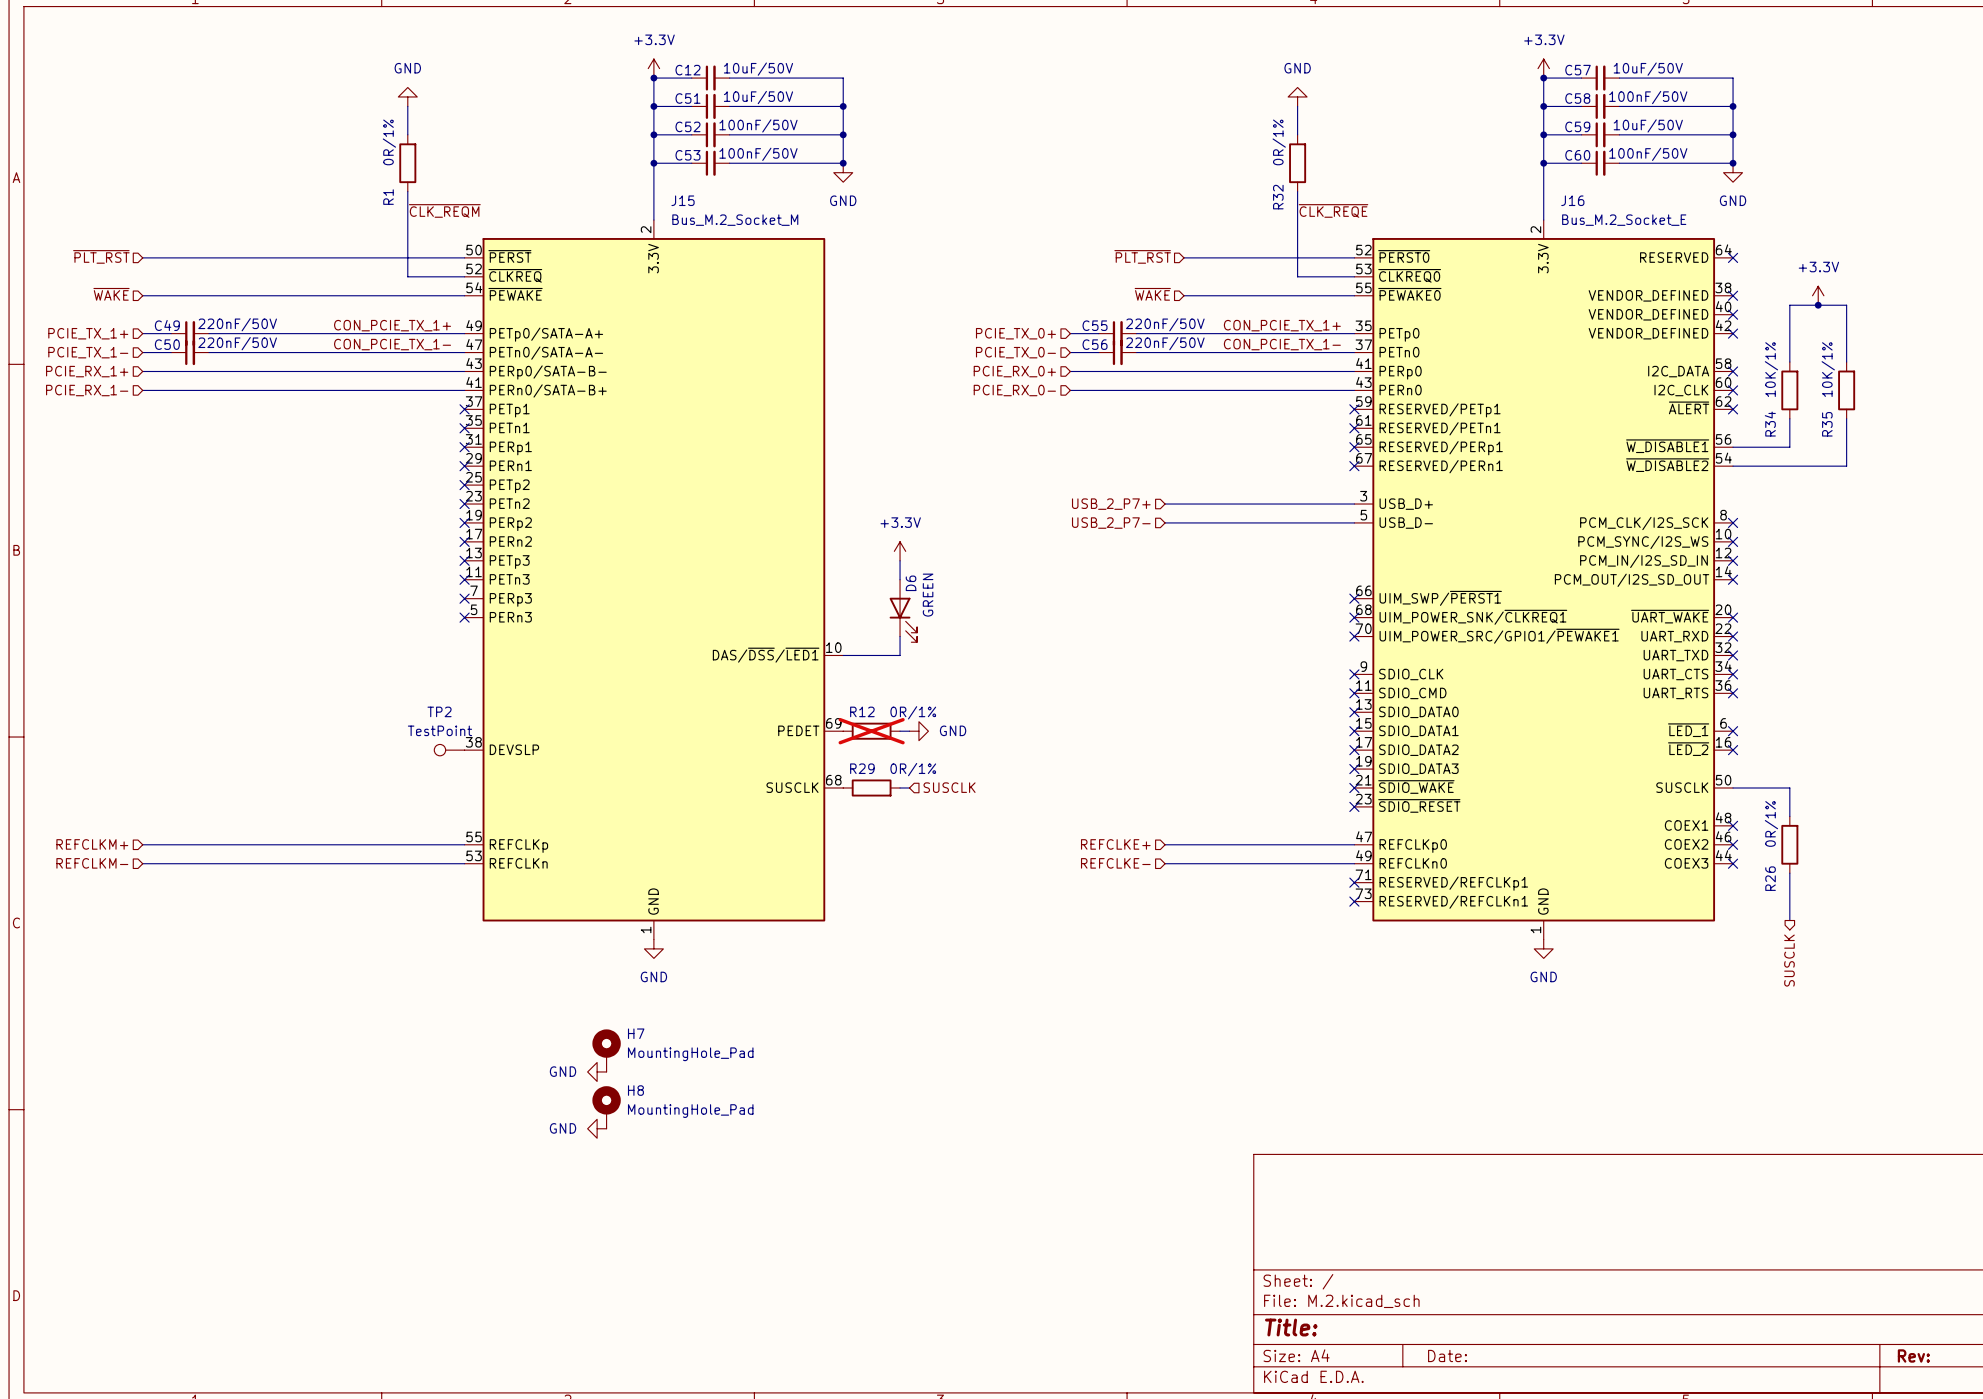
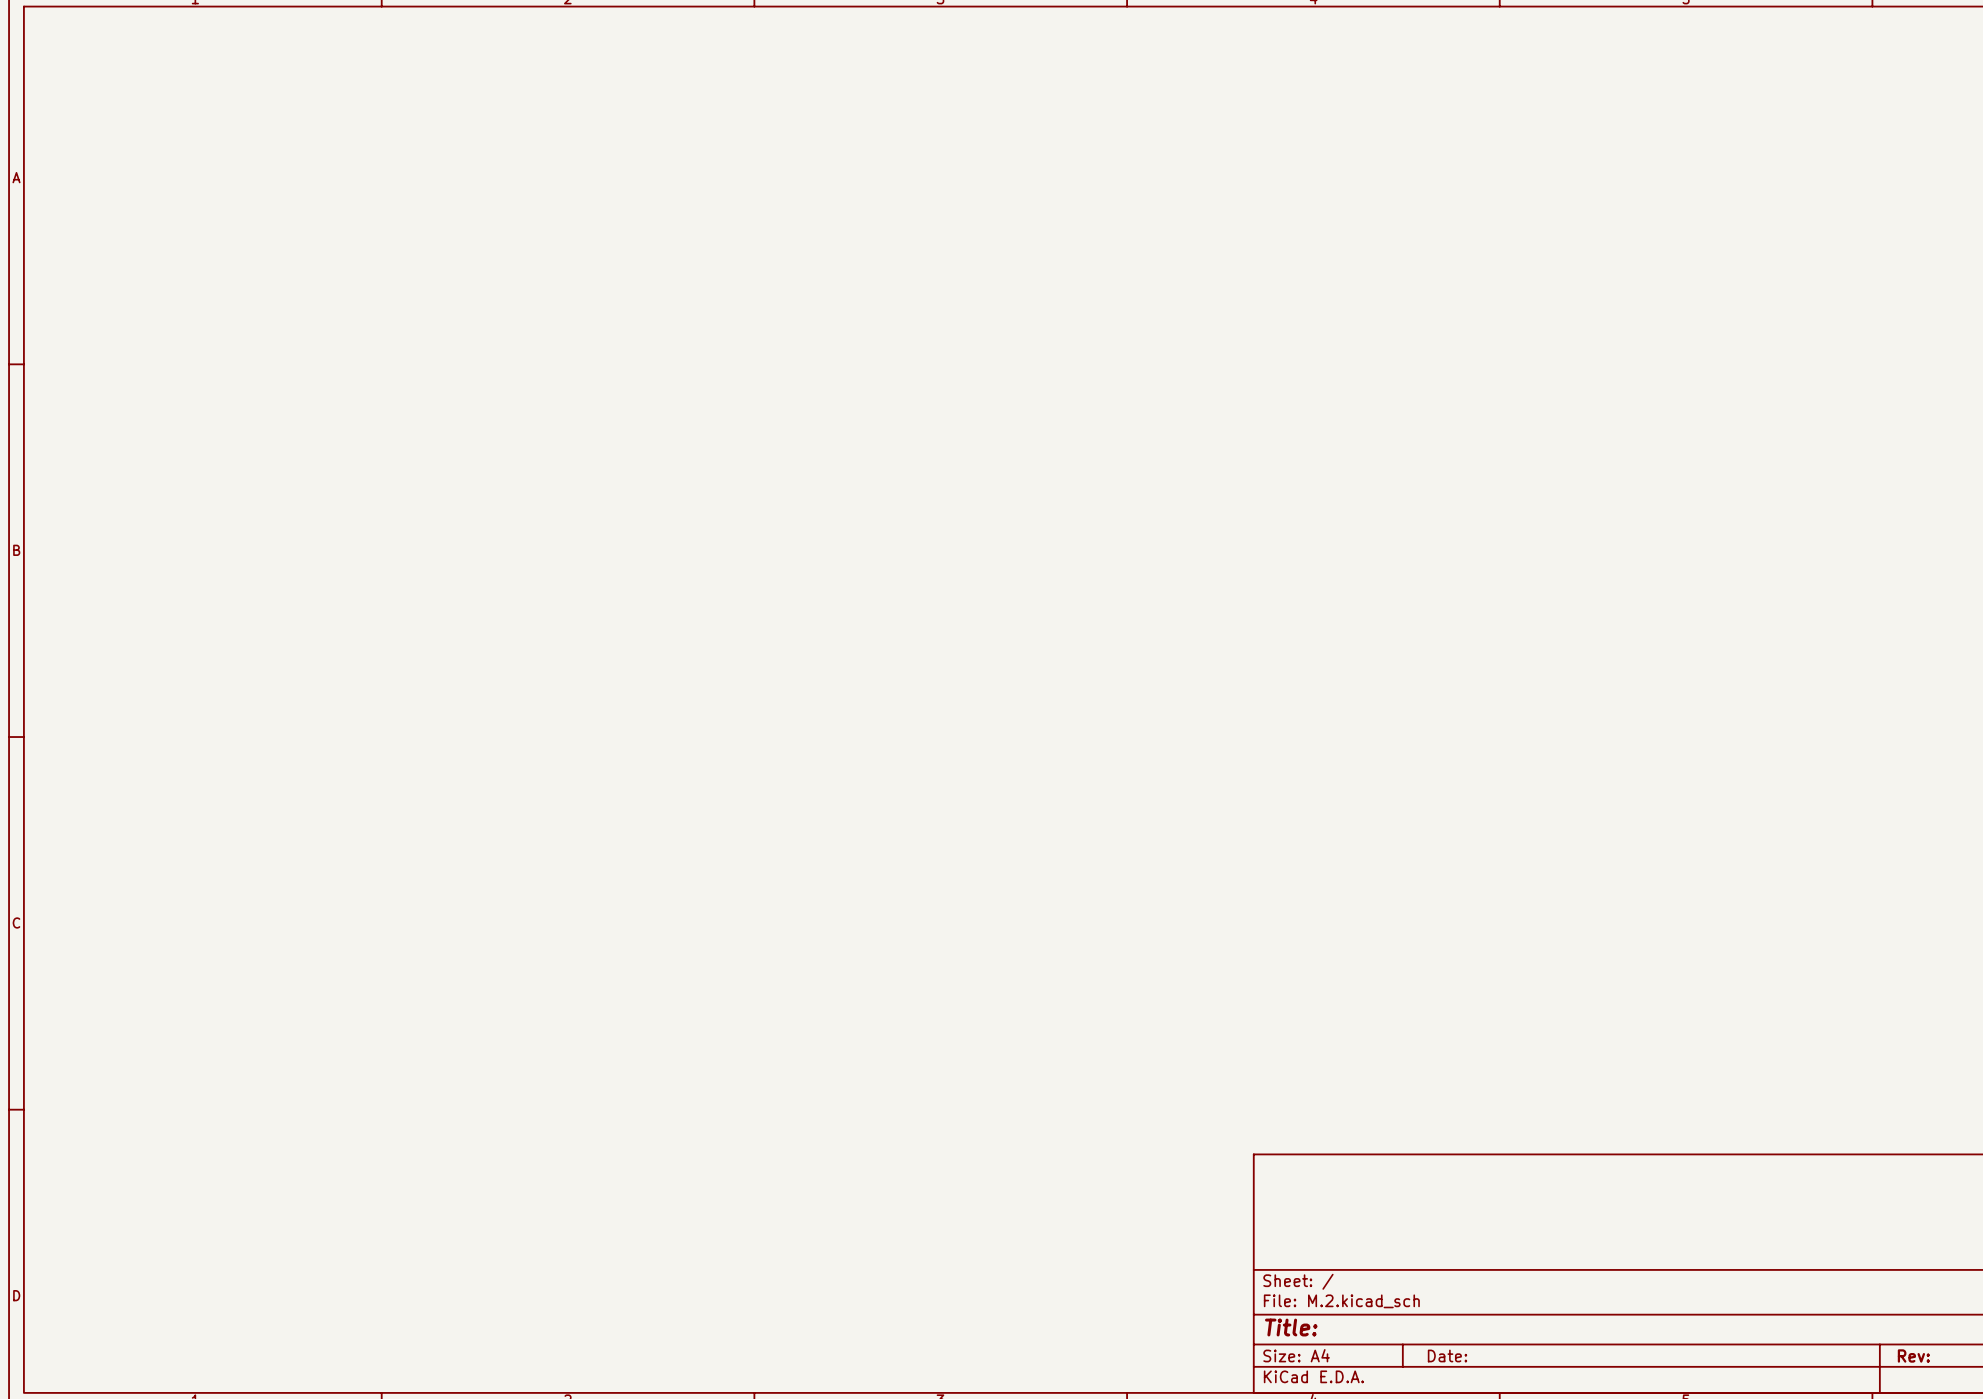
power symbol: +3.3V (653, 68) -> none
power symbol: +3.3V (1543, 68) -> none
junction: (653, 78) -> none
wire: (691, 78) (653, 78) (653, 220) -> none
C12: 10uF/50V (710, 78) -> none
wire: (729, 78) (843, 78) (843, 163) (729, 163) -> none
junction: (1543, 78) -> none
wire: (1581, 78) (1543, 78) (1543, 220) -> none
C57: 10uF/50V (1600, 78) -> none
wire: (1619, 78) (1733, 78) (1733, 163) (1619, 163) -> none
power symbol: GND (407, 96) -> none
power symbol: GND (1297, 96) -> none
wire: (407, 106) (407, 134) -> none
wire: (653, 106) (691, 106) -> none
junction: (653, 106) -> none
C51: 10uF/50V (710, 106) -> none
wire: (729, 106) (843, 106) -> none
junction: (843, 106) -> none
wire: (1297, 106) (1297, 134) -> none
wire: (1543, 106) (1581, 106) -> none
junction: (1543, 106) -> none
C58: 100nF/50V (1600, 106) -> none
wire: (1619, 106) (1733, 106) -> none
junction: (1733, 106) -> none
wire: (653, 134) (691, 134) -> none
junction: (653, 134) -> none
C52: 100nF/50V (710, 134) -> none
wire: (729, 134) (843, 134) -> none
junction: (843, 134) -> none
wire: (1543, 134) (1581, 134) -> none
junction: (1543, 134) -> none
C59: 10uF/50V (1600, 134) -> none
wire: (1619, 134) (1733, 134) -> none
junction: (1733, 134) -> none
R1: 0R/1% (407, 163) -> none
wire: (653, 163) (691, 163) -> none
junction: (653, 163) -> none
C53: 100nF/50V (710, 163) -> none
junction: (843, 163) -> none
R32: 0R/1% (1297, 163) -> none
wire: (1543, 163) (1581, 163) -> none
junction: (1543, 163) -> none
C60: 100nF/50V (1600, 163) -> none
junction: (1733, 163) -> none
power symbol: GND (843, 172) -> none
power symbol: GND (1733, 172) -> none
wire: (407, 191) (407, 276) (464, 276) -> none
wire: (1297, 191) (1297, 276) (1354, 276) -> none
label: ~{CLK_REQM} (444, 210) -> none
label: ~{CLK_REQE} (1333, 210) -> none
hierarchical label: ~{PLT_RST} (101, 256) -> none
hierarchical label: ~{PLT_RST} (1142, 256) -> none
wire: (142, 257) (464, 257) -> none
wire: (1184, 257) (1354, 257) -> none
no-connect mark: (1733, 257) -> none
hierarchical label: ~{WAKE} (111, 294) -> none
hierarchical label: ~{WAKE} (1152, 294) -> none
wire: (142, 295) (464, 295) -> none
wire: (1184, 295) (1354, 295) -> none
no-connect mark: (1733, 295) -> none
power symbol: +3.3V (1818, 295) -> none
junction: (1818, 305) -> none
no-connect mark: (1733, 314) -> none
label: CON_PCIE_TX_1+ (392, 325) -> none
label: CON_PCIE_TX_1+ (1282, 325) -> none
hierarchical label: PCIE_TX_1+ (88, 333) -> none
wire: (142, 333) (171, 333) -> none
C49: 220nF/50V (190, 333) -> none
wire: (209, 333) (464, 333) -> none
hierarchical label: PCIE_TX_0+ (1015, 333) -> none
wire: (1070, 333) (1098, 333) -> none
C55: 220nF/50V (1117, 333) -> none
wire: (1136, 333) (1354, 333) -> none
no-connect mark: (1733, 333) -> none
label: CON_PCIE_TX_1- (392, 344) -> none
label: CON_PCIE_TX_1- (1282, 344) -> none
hierarchical label: PCIE_TX_1- (88, 352) -> none
wire: (142, 352) (171, 352) -> none
C50: 220nF/50V (190, 352) -> none
wire: (209, 352) (464, 352) -> none
hierarchical label: PCIE_TX_0- (1015, 352) -> none
wire: (1070, 352) (1098, 352) -> none
C56: 220nF/50V (1117, 352) -> none
wire: (1136, 352) (1354, 352) -> none
wire: (1789, 362) (1789, 305) (1846, 305) (1846, 362) -> none
hierarchical label: PCIE_RX_1+ (87, 371) -> none
wire: (142, 371) (464, 371) -> none
hierarchical label: PCIE_RX_0+ (1014, 371) -> none
wire: (1070, 371) (1354, 371) -> none
no-connect mark: (1733, 371) -> none
hierarchical label: PCIE_RX_1- (87, 390) -> none
wire: (142, 390) (464, 390) -> none
hierarchical label: PCIE_RX_0- (1014, 390) -> none
wire: (1070, 390) (1354, 390) -> none
no-connect mark: (1733, 390) -> none
R34: 10K/1% (1789, 390) -> none
R35: 10K/1% (1846, 390) -> none
no-connect mark: (464, 409) -> none
no-connect mark: (1354, 409) -> none
no-connect mark: (1733, 409) -> none
wire: (1789, 418) (1789, 447) (1733, 447) -> none
wire: (1846, 418) (1846, 466) (1733, 466) -> none
no-connect mark: (464, 428) -> none
no-connect mark: (1354, 428) -> none
no-connect mark: (464, 447) -> none
no-connect mark: (1354, 447) -> none
no-connect mark: (464, 466) -> none
no-connect mark: (1354, 466) -> none
no-connect mark: (464, 485) -> none
no-connect mark: (464, 504) -> none
hierarchical label: USB_2_P7+ (1111, 504) -> none
wire: (1165, 504) (1354, 504) -> none
no-connect mark: (464, 522) -> none
wire: (1165, 522) (1354, 522) -> none
no-connect mark: (1733, 522) -> none
hierarchical label: USB_2_P7- (1111, 523) -> none
no-connect mark: (464, 541) -> none
no-connect mark: (1733, 541) -> none
power symbol: +3.3V (900, 551) -> none
no-connect mark: (464, 560) -> none
wire: (900, 560) (900, 579) -> none
no-connect mark: (1733, 560) -> none
no-connect mark: (464, 579) -> none
J15: Bus_M.2_Socket_M (653, 579) -> none
J16: Bus_M.2_Socket_E (1543, 579) -> none
no-connect mark: (1733, 579) -> none
no-connect mark: (464, 598) -> none
no-connect mark: (1354, 598) -> none
D6: GREEN (903, 610) -> none
no-connect mark: (464, 617) -> none
no-connect mark: (1354, 617) -> none
no-connect mark: (1733, 617) -> none
wire: (900, 636) (900, 655) (843, 655) -> none
no-connect mark: (1354, 636) -> none
no-connect mark: (1733, 636) -> none
no-connect mark: (1733, 655) -> none
no-connect mark: (1354, 674) -> none
no-connect mark: (1733, 674) -> none
no-connect mark: (1354, 693) -> none
no-connect mark: (1733, 693) -> none
no-connect mark: (1354, 712) -> none
R12: 0R/1% (871, 731) -> none
wire: (900, 731) (909, 731) -> none
power symbol: GND (918, 731) -> none
no-connect mark: (1354, 731) -> none
no-connect mark: (1733, 731) -> none
TP2: TestPoint (449, 750) -> none
no-connect mark: (1354, 750) -> none
no-connect mark: (1733, 750) -> none
no-connect mark: (1354, 769) -> none
R29: 0R/1% (871, 787) -> none
wire: (900, 787) (909, 787) -> none
hierarchical label: SUSCLK (949, 787) -> none
no-connect mark: (1354, 787) -> none
wire: (1733, 787) (1789, 787) (1789, 816) -> none
no-connect mark: (1354, 806) -> none
no-connect mark: (1733, 825) -> none
hierarchical label: REFCLKM+ (92, 844) -> none
wire: (142, 844) (464, 844) -> none
hierarchical label: REFCLKE+ (1115, 844) -> none
wire: (1165, 844) (1354, 844) -> none
no-connect mark: (1733, 844) -> none
R26: 0R/1% (1789, 844) -> none
hierarchical label: REFCLKM- (92, 863) -> none
wire: (142, 863) (464, 863) -> none
hierarchical label: REFCLKE- (1115, 863) -> none
wire: (1165, 863) (1354, 863) -> none
no-connect mark: (1733, 863) -> none
wire: (1789, 873) (1789, 920) -> none
no-connect mark: (1354, 882) -> none
no-connect mark: (1354, 901) -> none
power symbol: GND (653, 948) -> none
power symbol: GND (1543, 948) -> none
hierarchical label: SUSCLK (1789, 960) -> none
H7: MountingHole_Pad (606, 1050) -> none
power symbol: GND (597, 1071) -> none
H8: MountingHole_Pad (606, 1107) -> none
power symbol: GND (597, 1128) -> none

